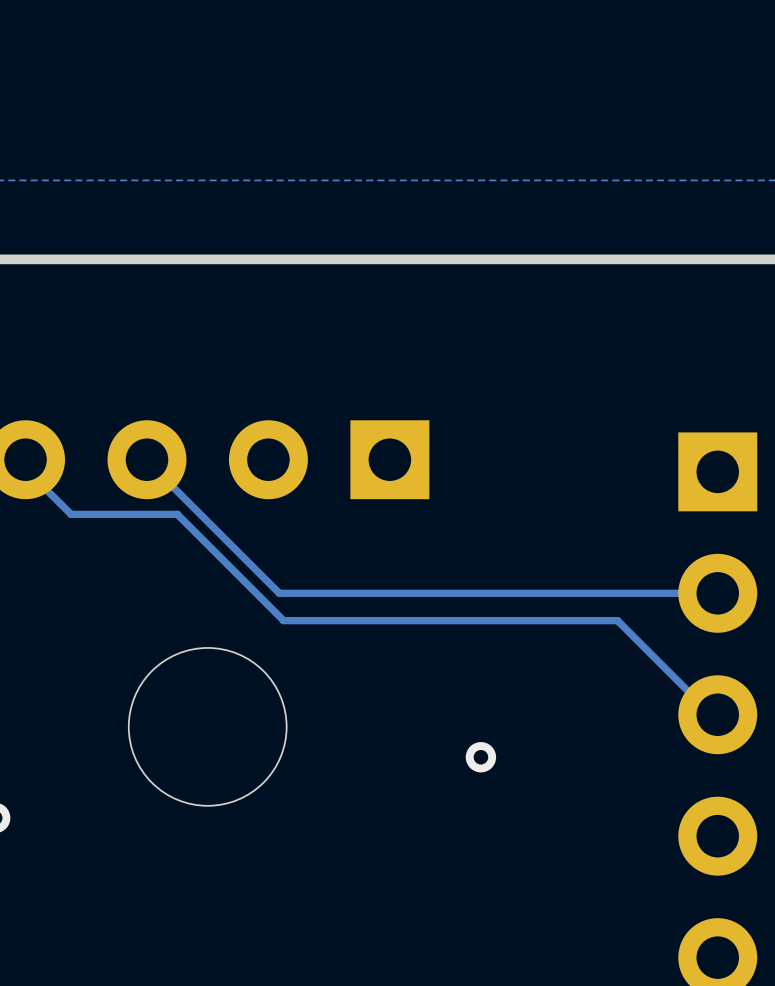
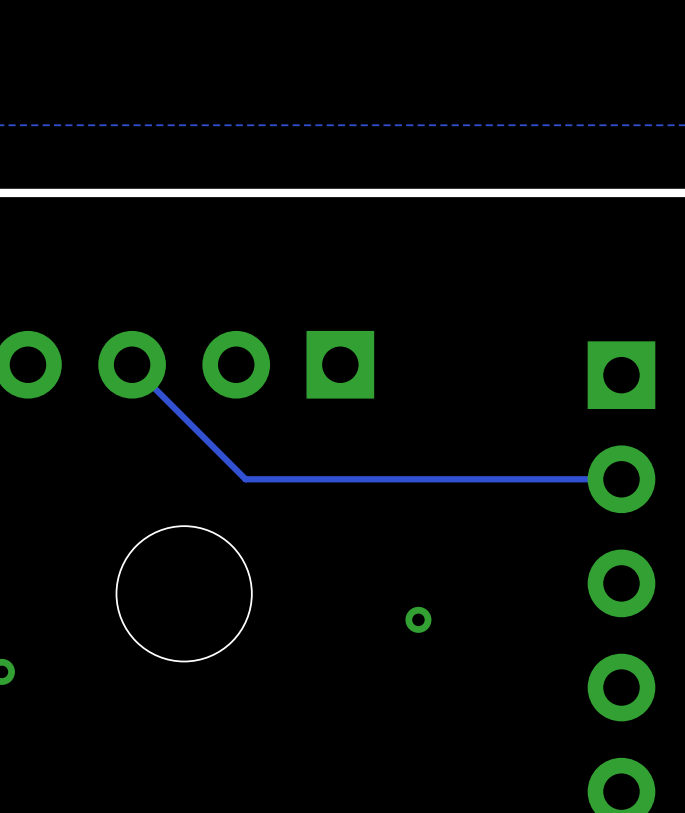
track: (25, 459) (25, 468) (71, 514) (177, 514) (283, 620) (617, 620) (708, 711) (717, 714) -> none

